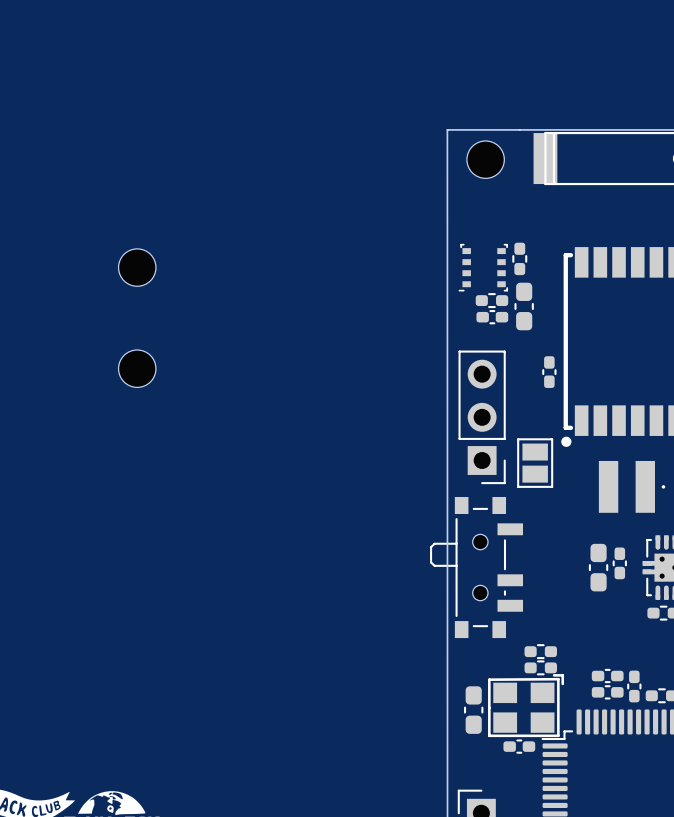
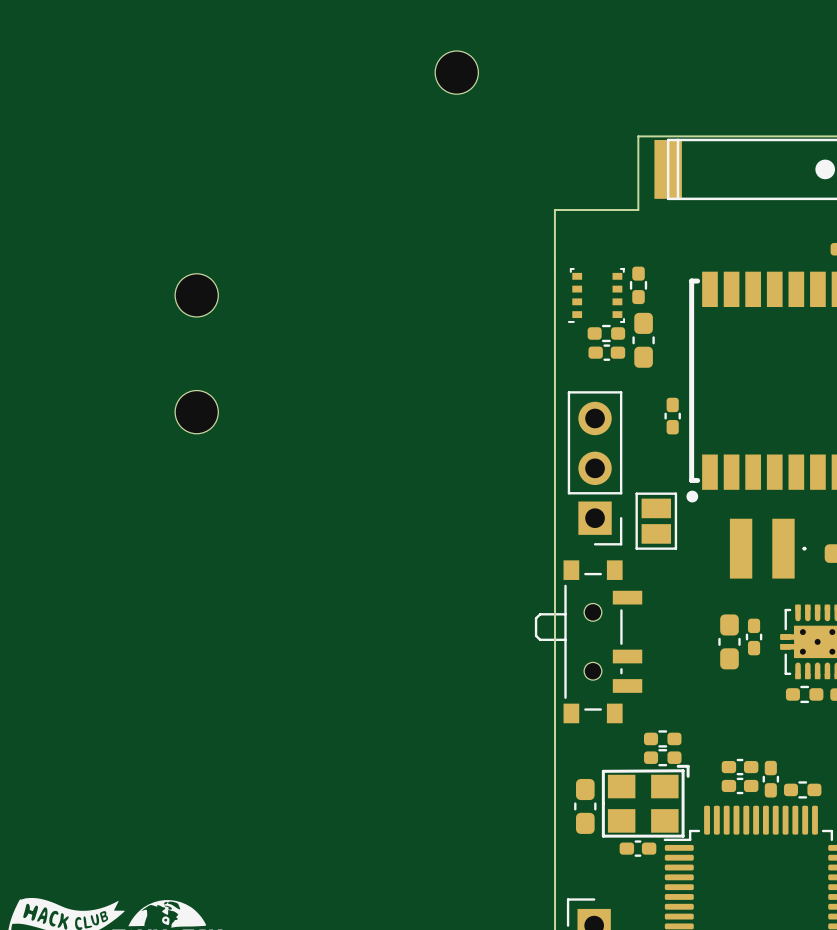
board edge: (519, 129) (447, 129) (447, 193) -> (638, 136) (638, 209) (554, 209)
part position: (485, 159) -> (456, 72)

